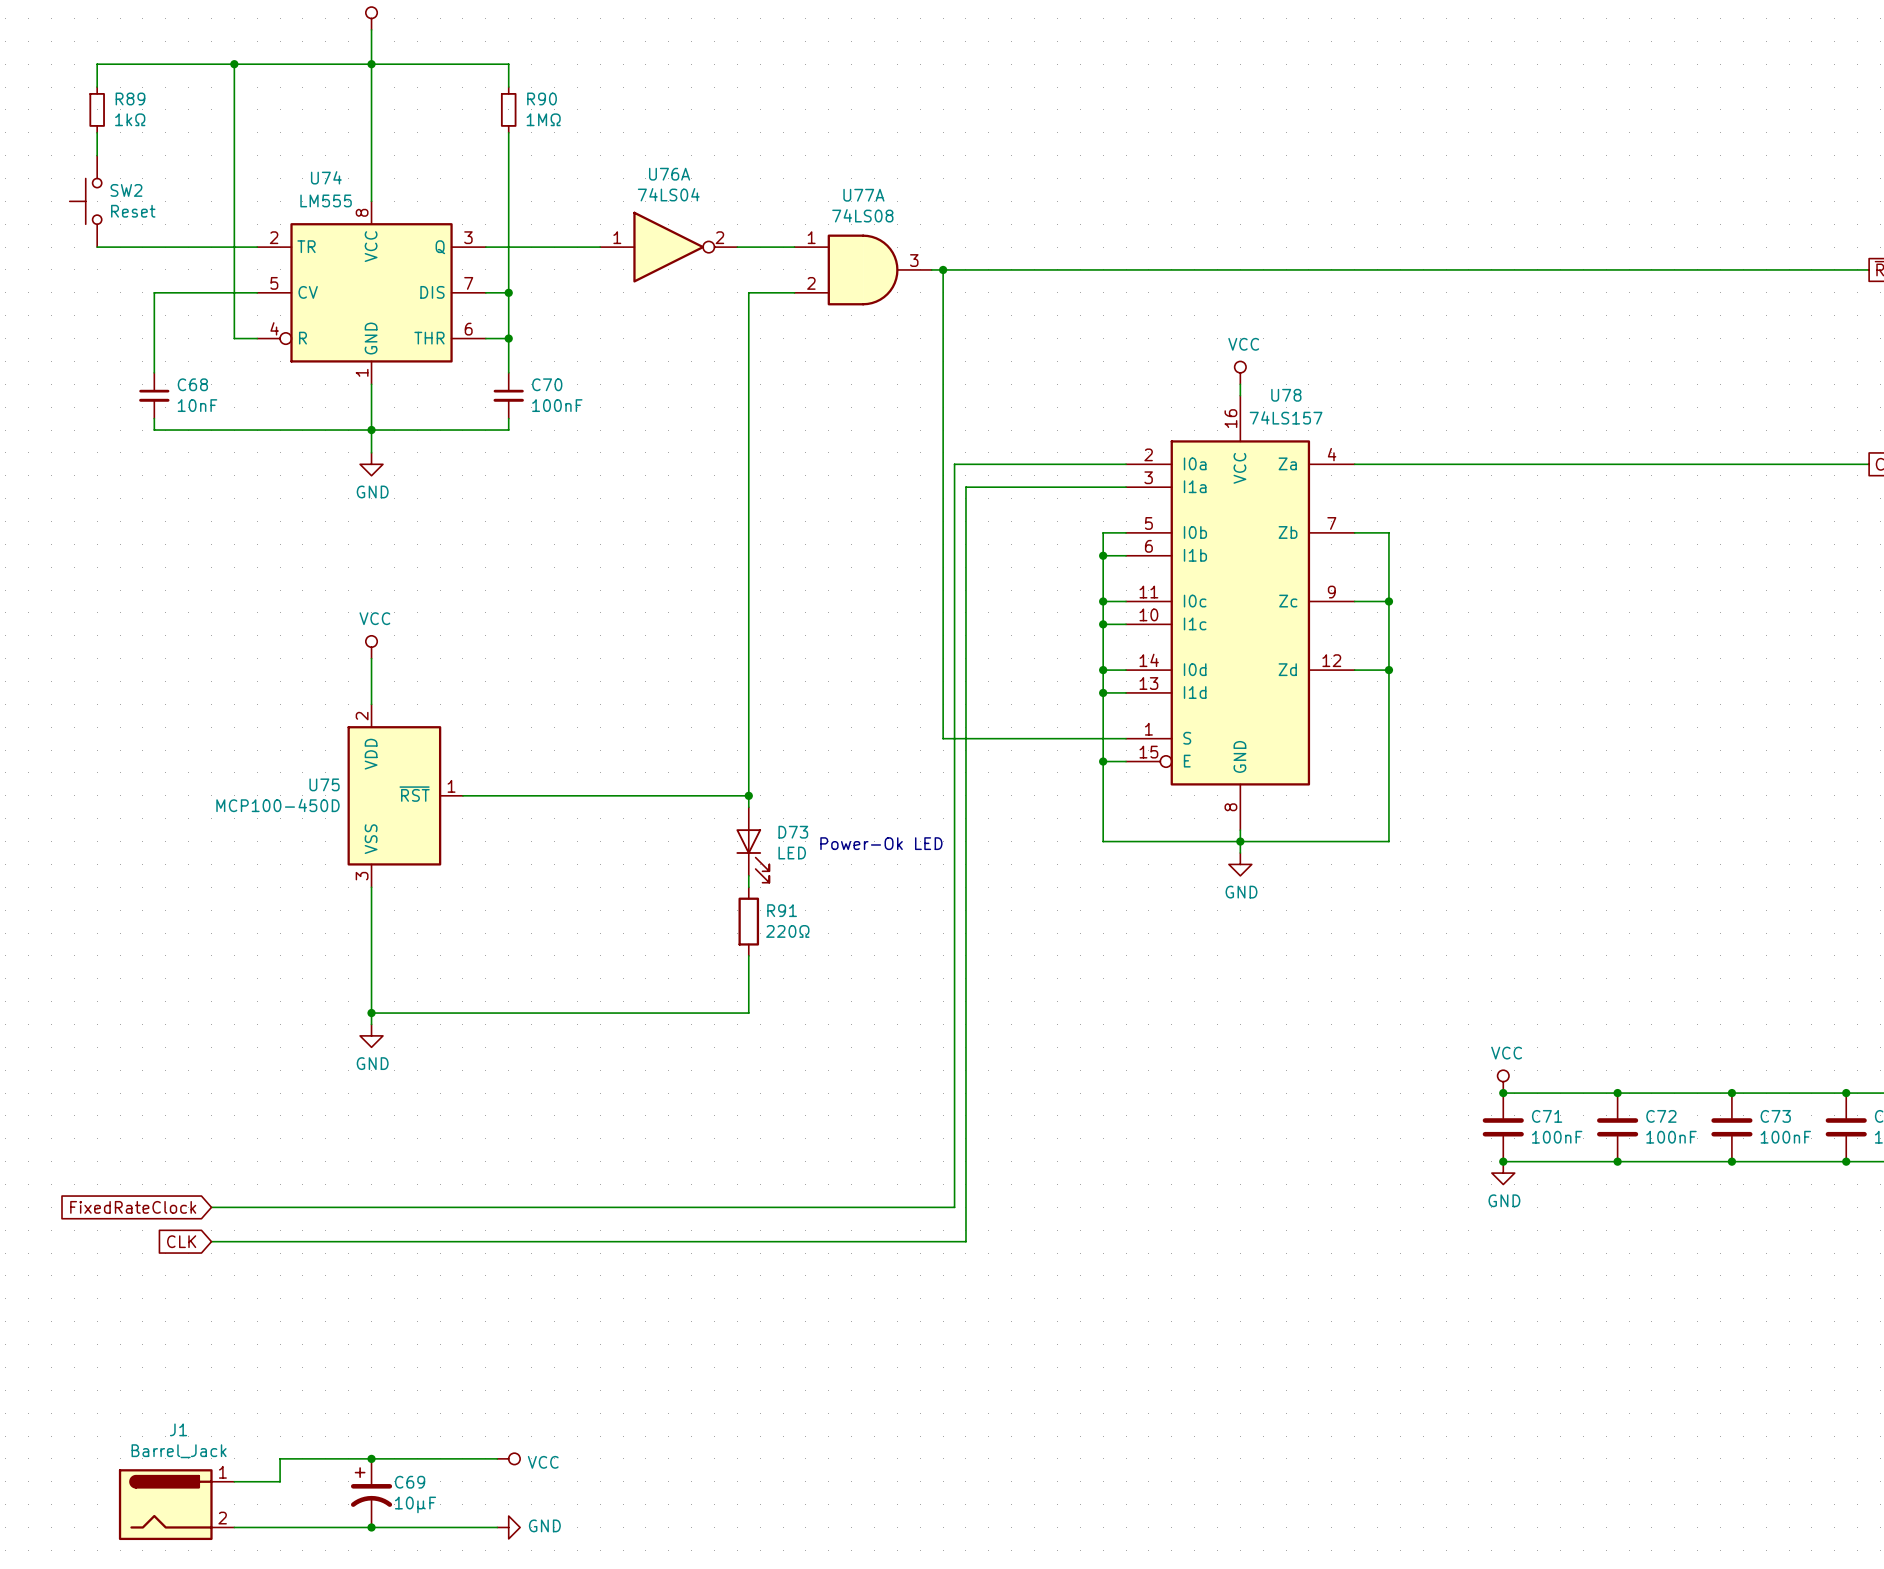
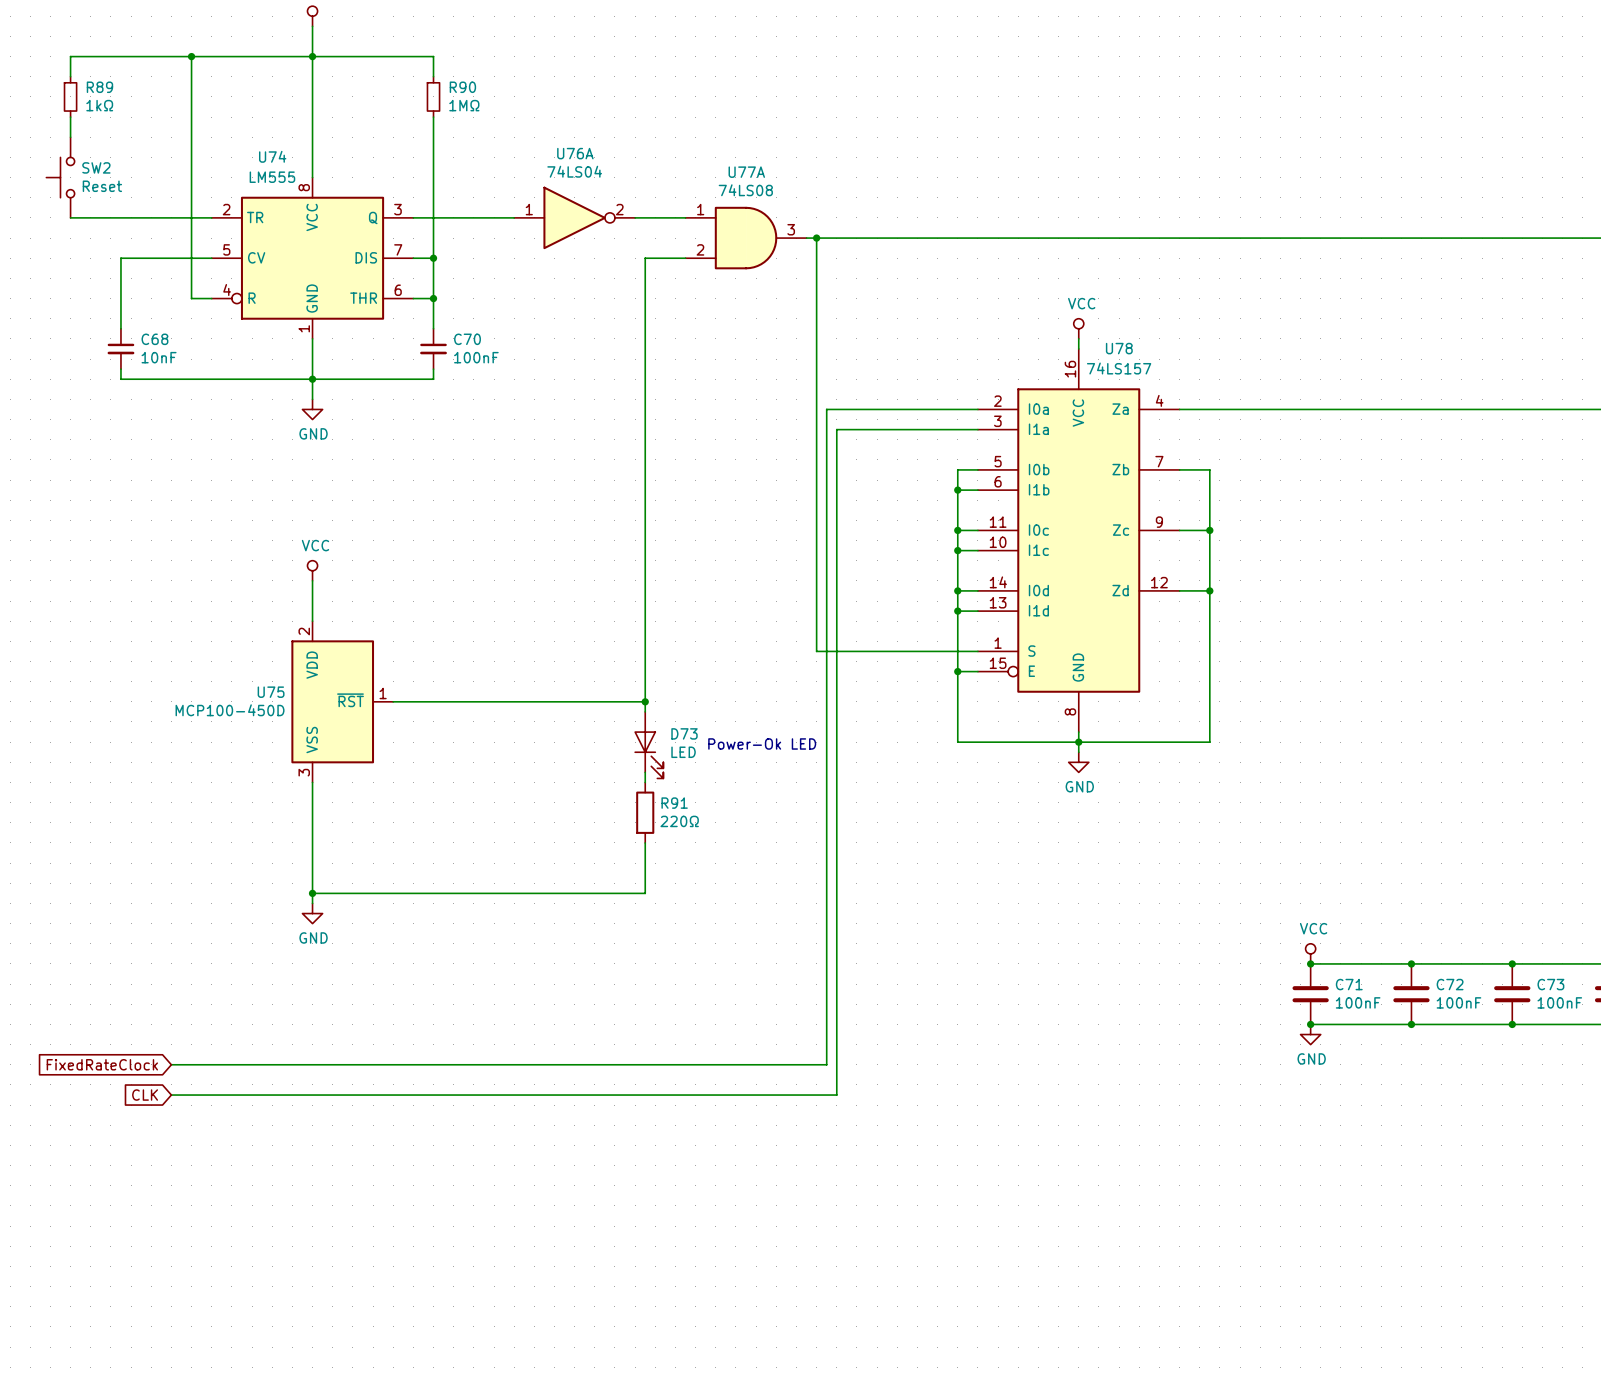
junction: (371, 1458) -> none
wire: (497, 1458) (280, 1458) (280, 1481) (234, 1481) -> none
power symbol: VCC (508, 1458) -> none
C69: 10µF (371, 1493) -> none
J1: Barrel_Jack (176, 1504) -> none
wire: (234, 1527) (497, 1527) -> none
junction: (371, 1527) -> none
power symbol: GND (508, 1527) -> none

